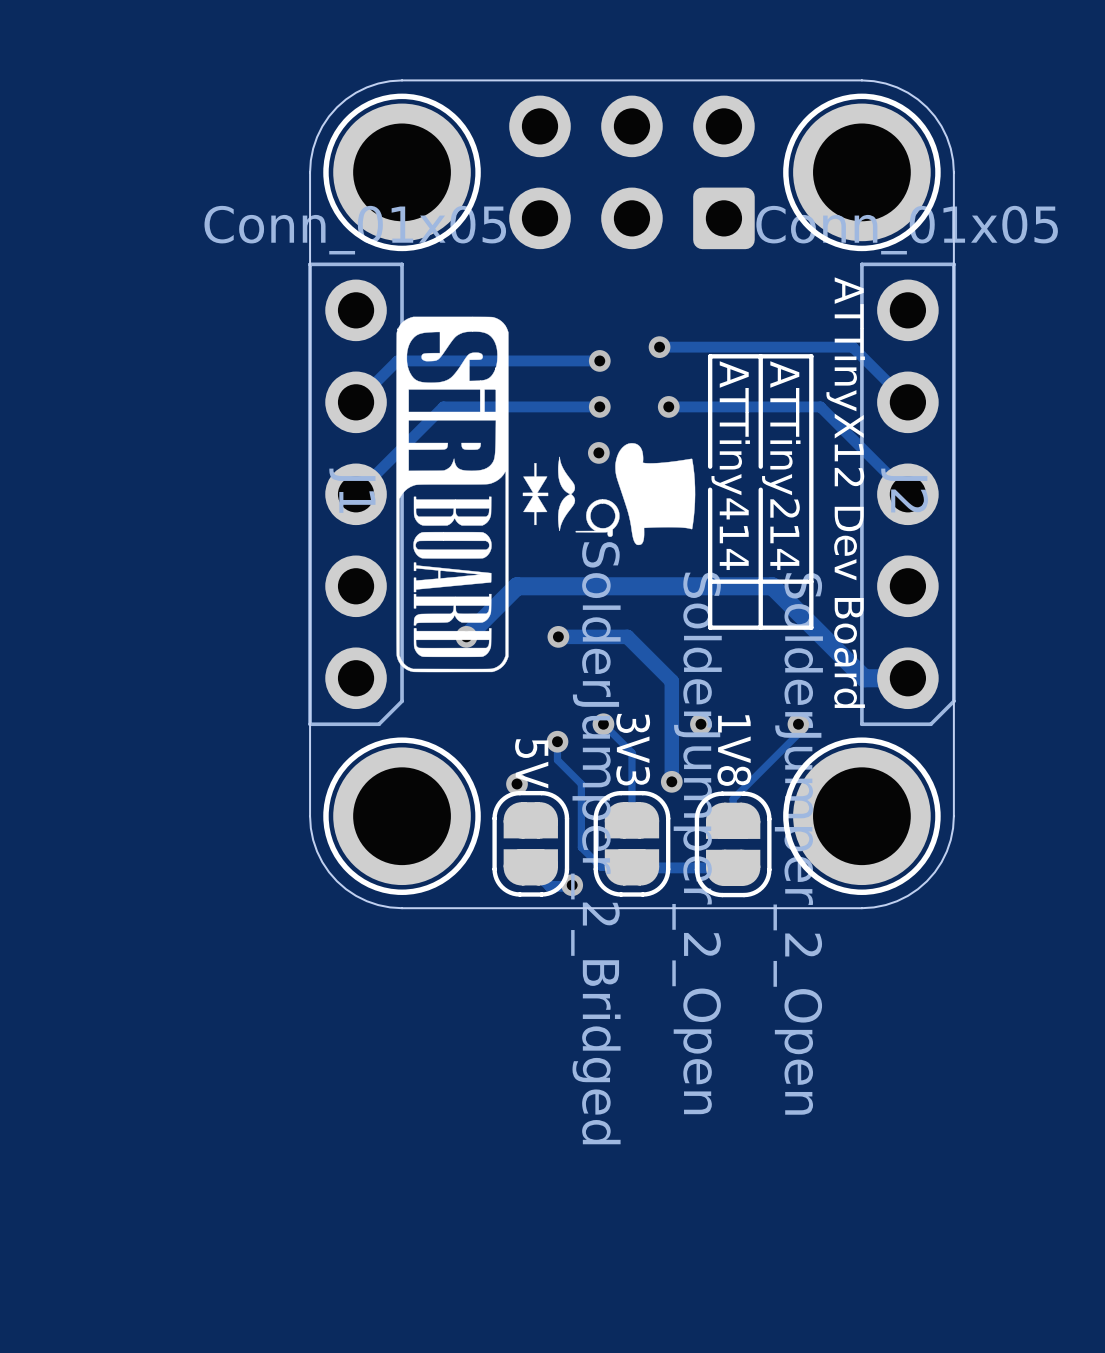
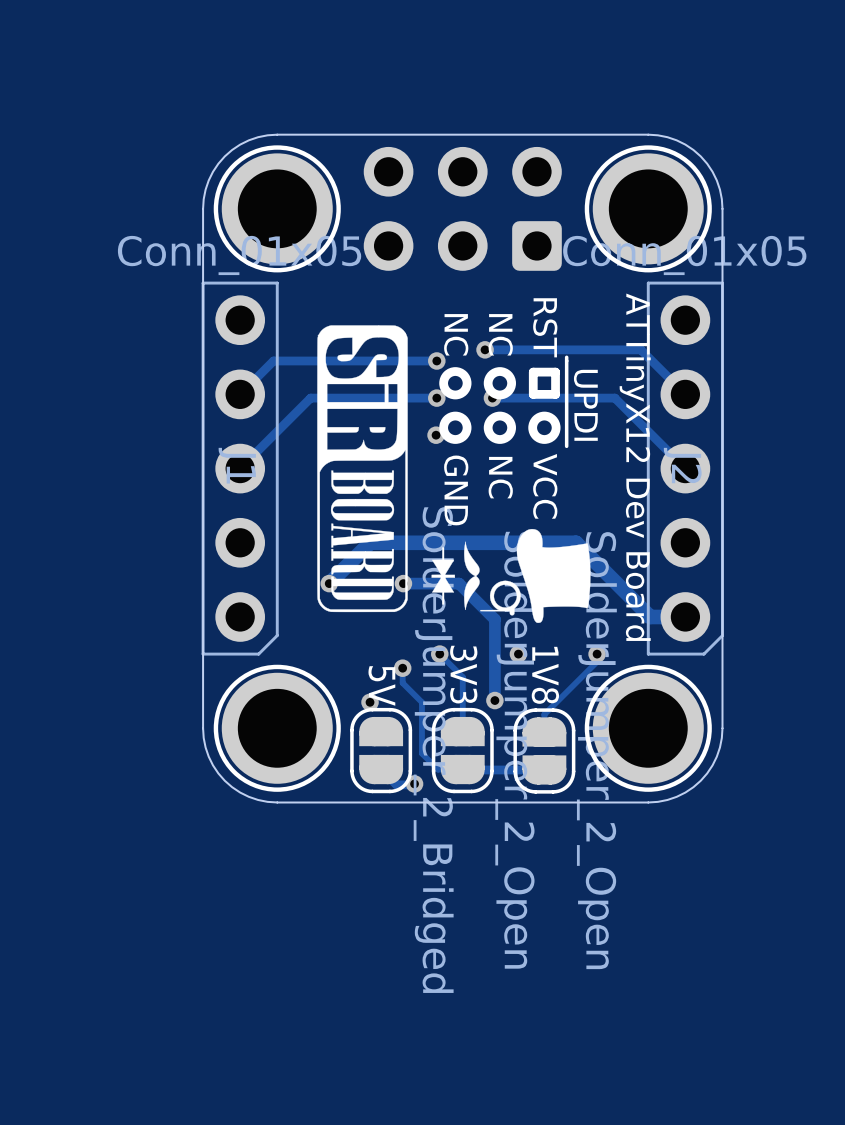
text: none -> NC (456, 334)
text: none -> NC (500, 334)
drawing: none -> [439, 367, 561, 444]
line: none -> (555, 372) (555, 394) (533, 394) (533, 372) (555, 372)
text: none -> UPDI (585, 405)
drawing: [522, 443, 696, 546] -> none
text: ATTiny414 (730, 465) -> RST (545, 327)
text: ATTiny214 (781, 465) -> none
line: (710, 466) (710, 356) (811, 356) (811, 627) (710, 627) (710, 489) -> none
line: (760, 489) (760, 627) -> none
drawing position: (452, 494) -> (362, 468)
text: none -> NC (500, 477)
text: none -> VCC (545, 486)
text: none -> GND (456, 490)
drawing: none -> [431, 528, 591, 623]
line: (811, 581) (710, 581) -> none

